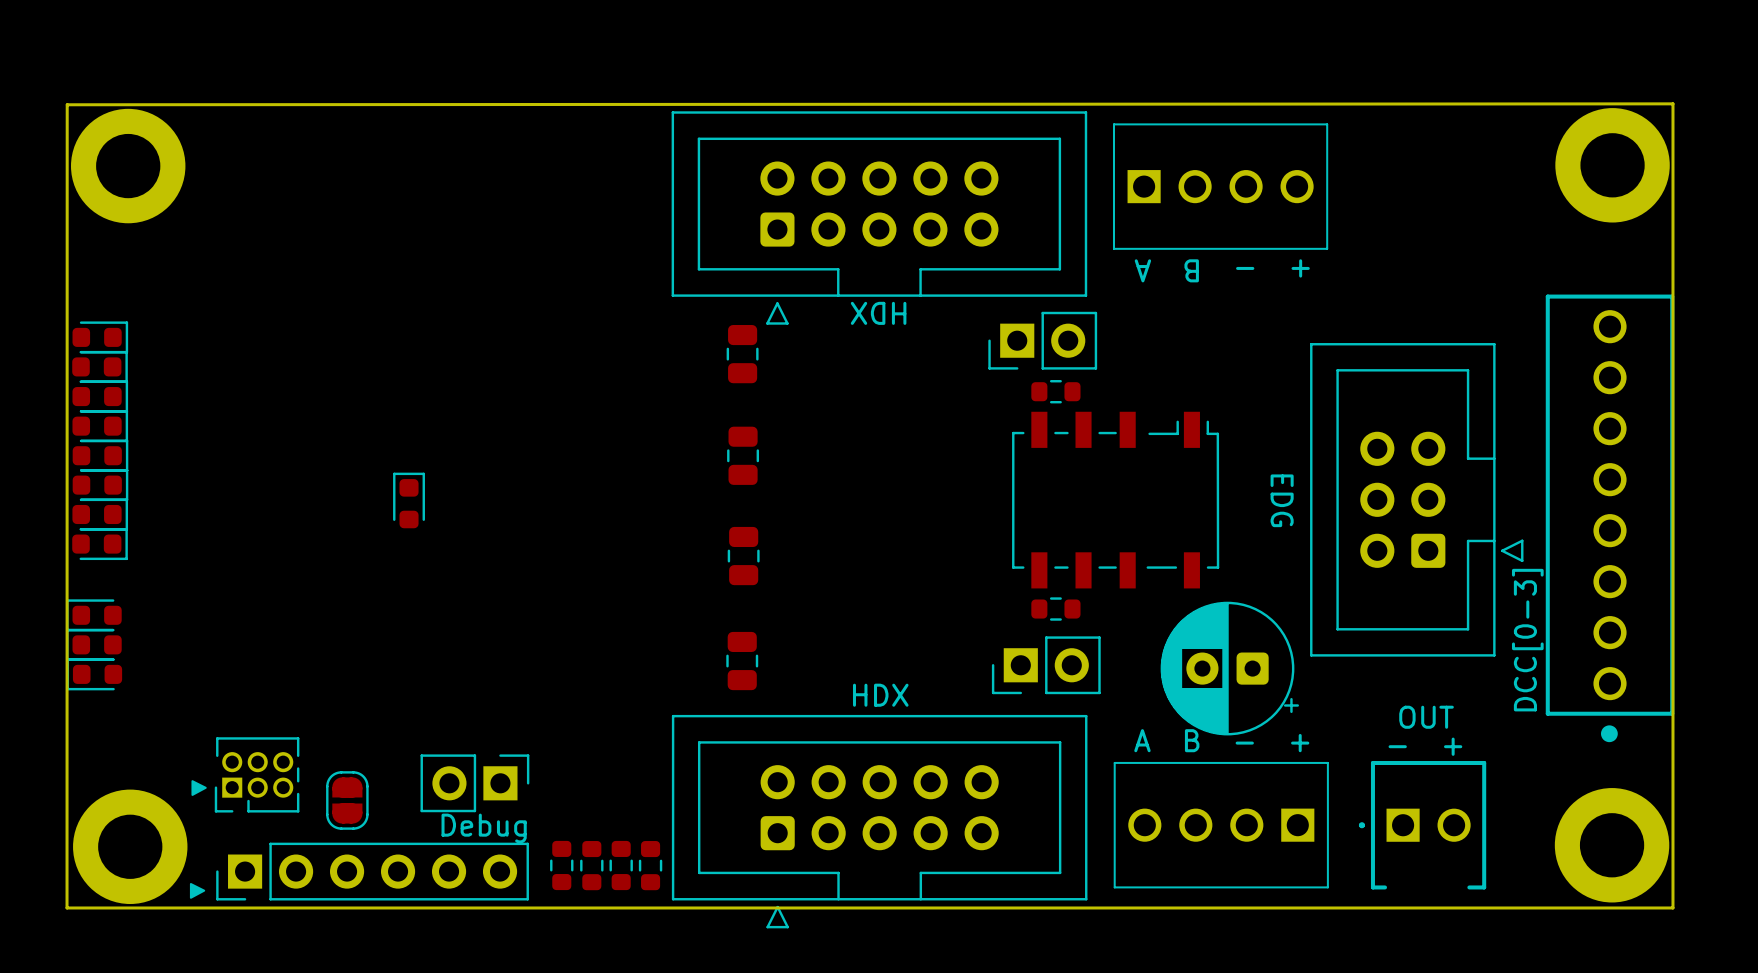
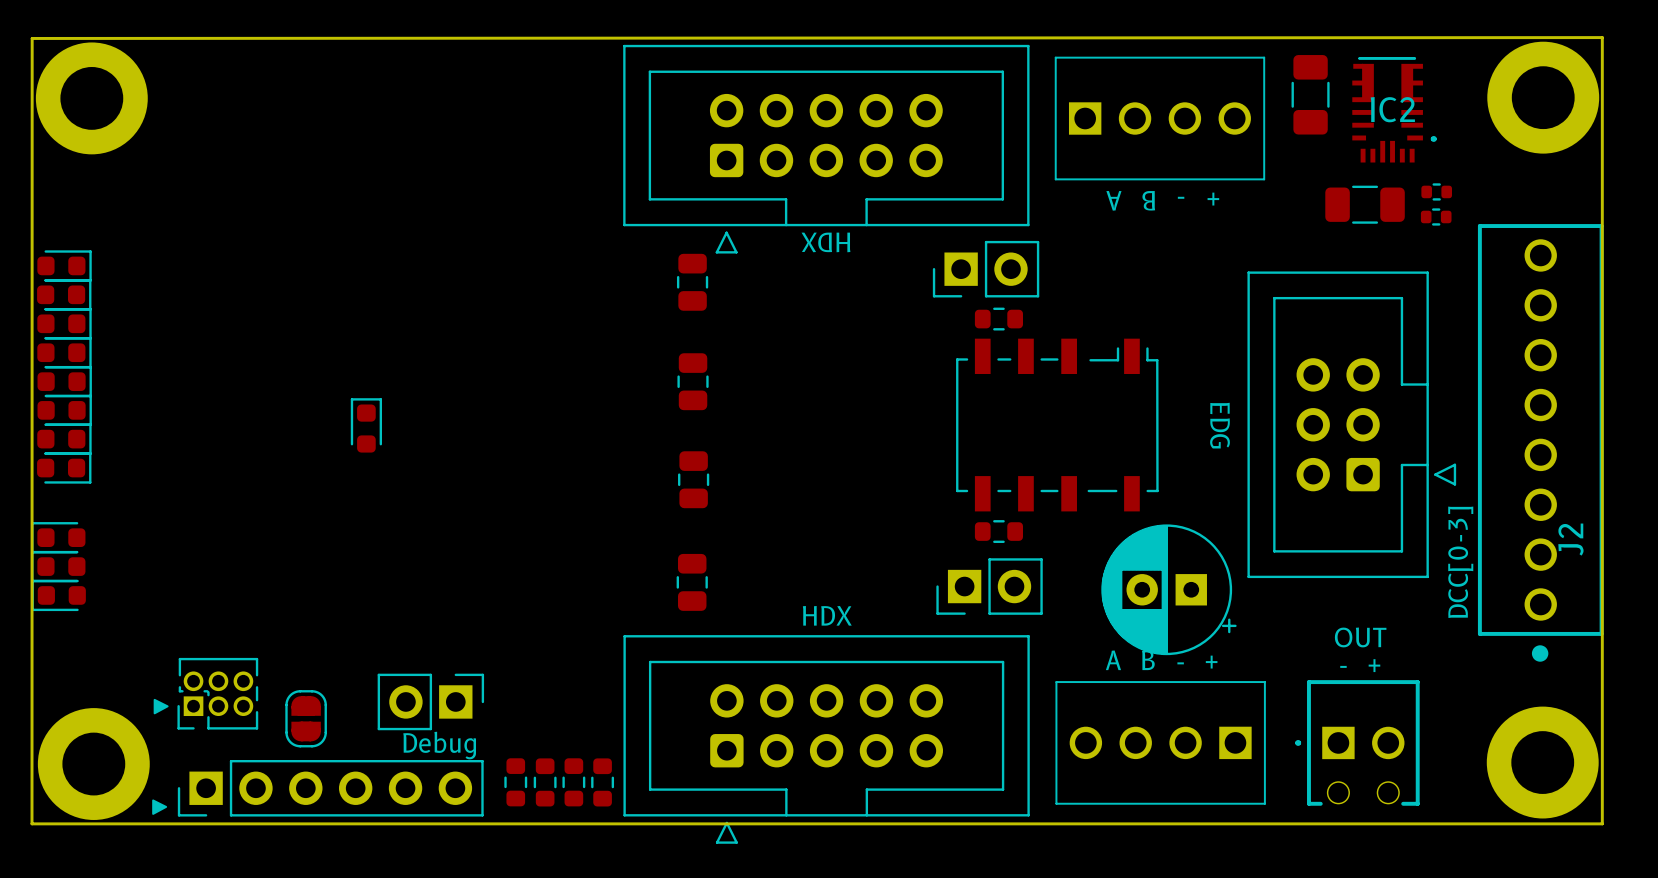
part: none -> (1310, 94)
IC2: none -> (1394, 109)
part: none -> (1436, 191)
part: none -> (1365, 204)
part: none -> (1436, 216)
part footprint: [1160, 601, 1299, 736] -> [1101, 524, 1237, 656]
J2 name: none -> J2 (1570, 539)
part footprint: [214, 737, 300, 813] -> [177, 657, 259, 730]
part footprint: [1358, 760, 1487, 890] -> [1295, 680, 1420, 806]

